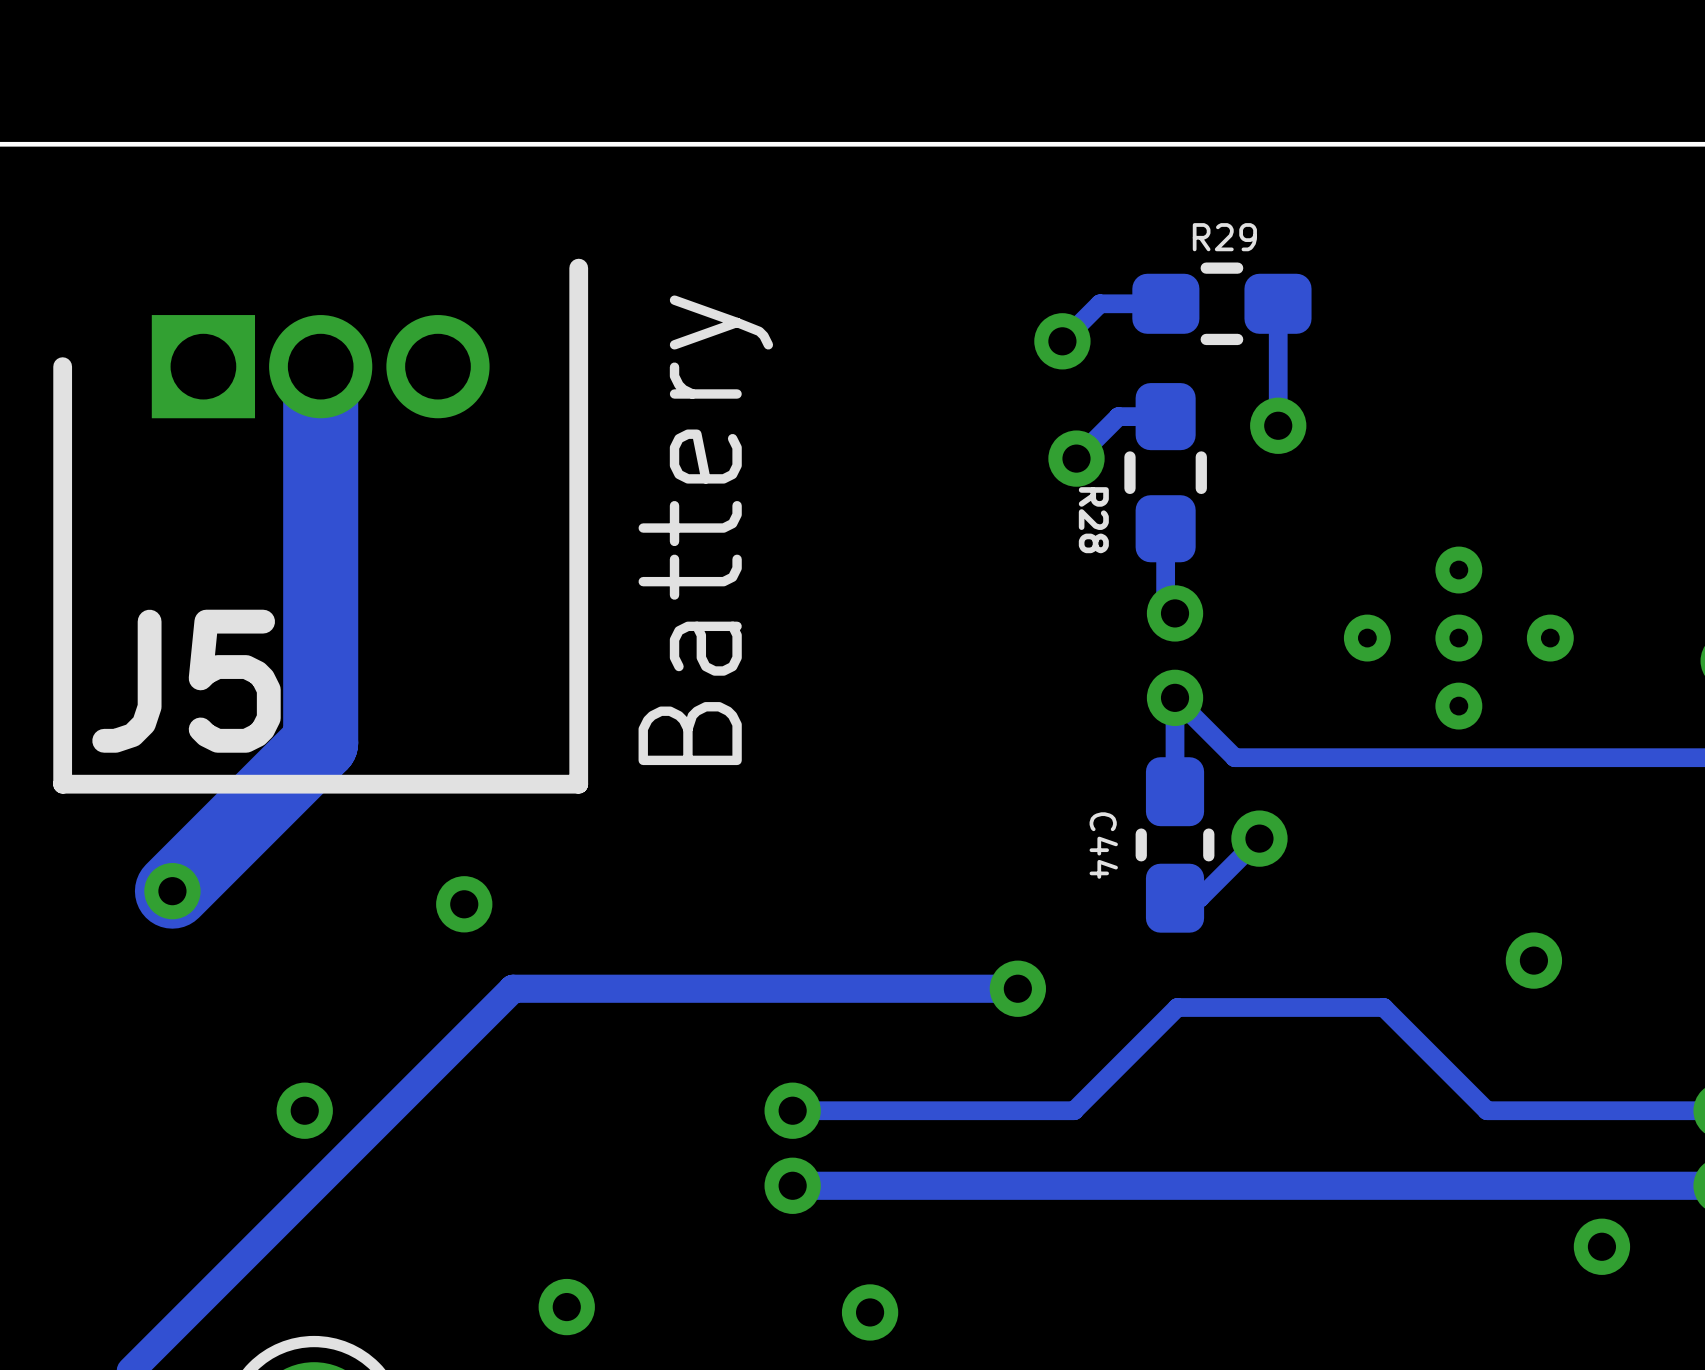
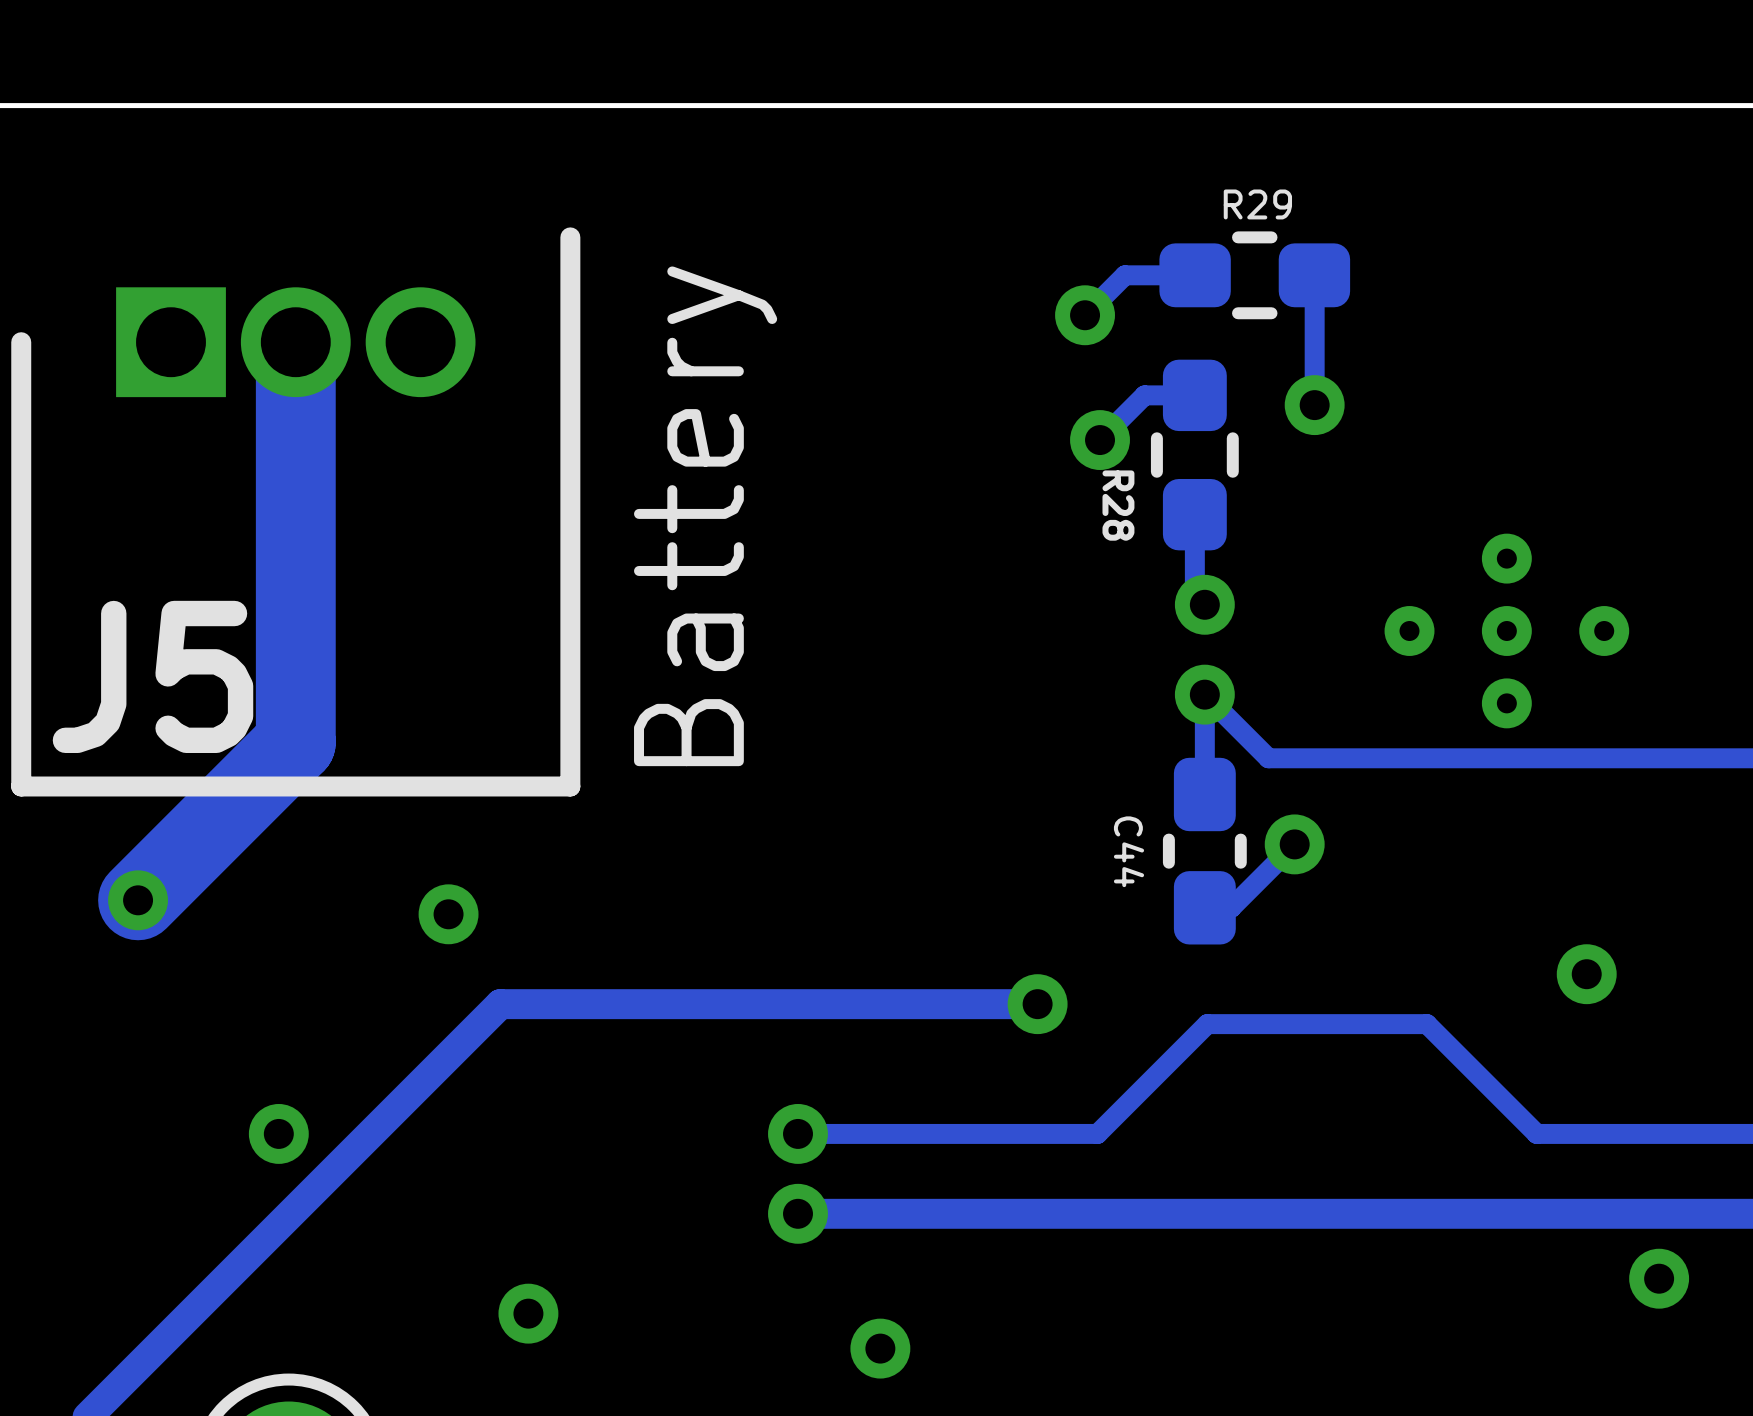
via position: (566, 1307) -> (528, 1313)

